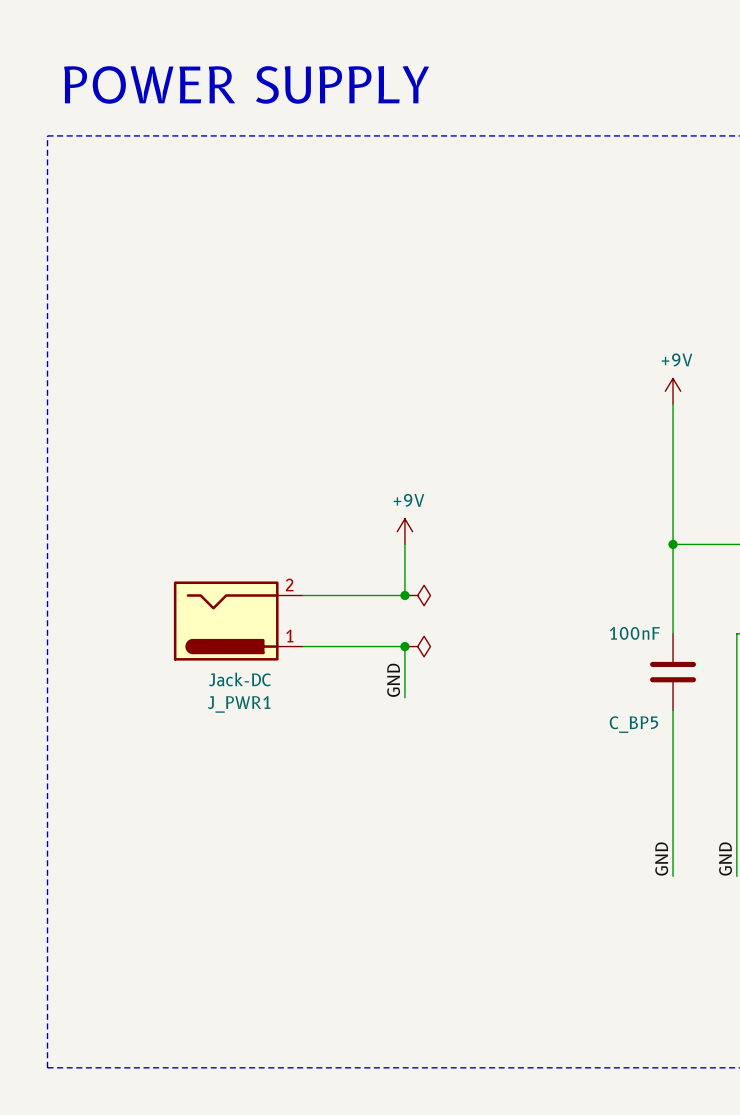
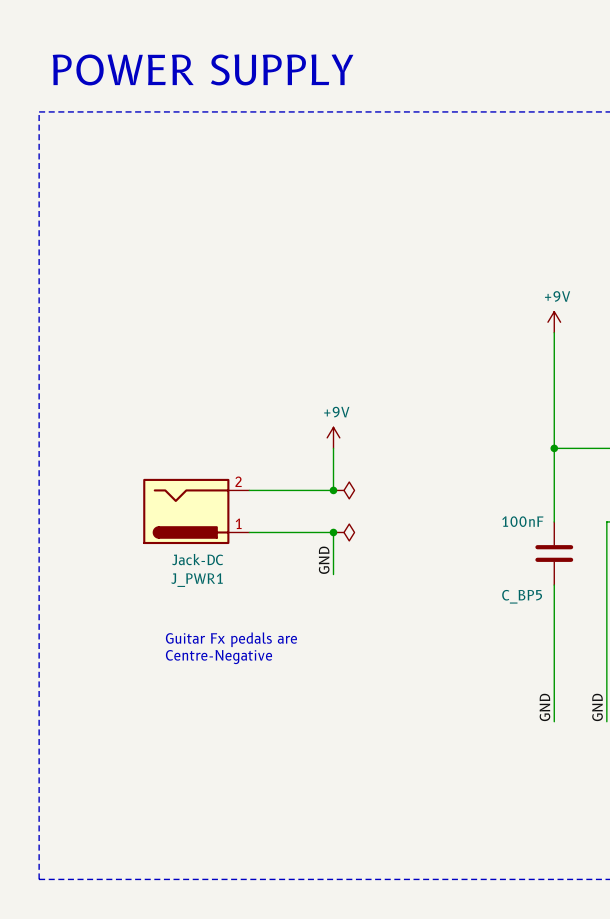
text: none -> Guitar Fx pedals are (231, 639)
text: none -> Centre-Negative (218, 657)

